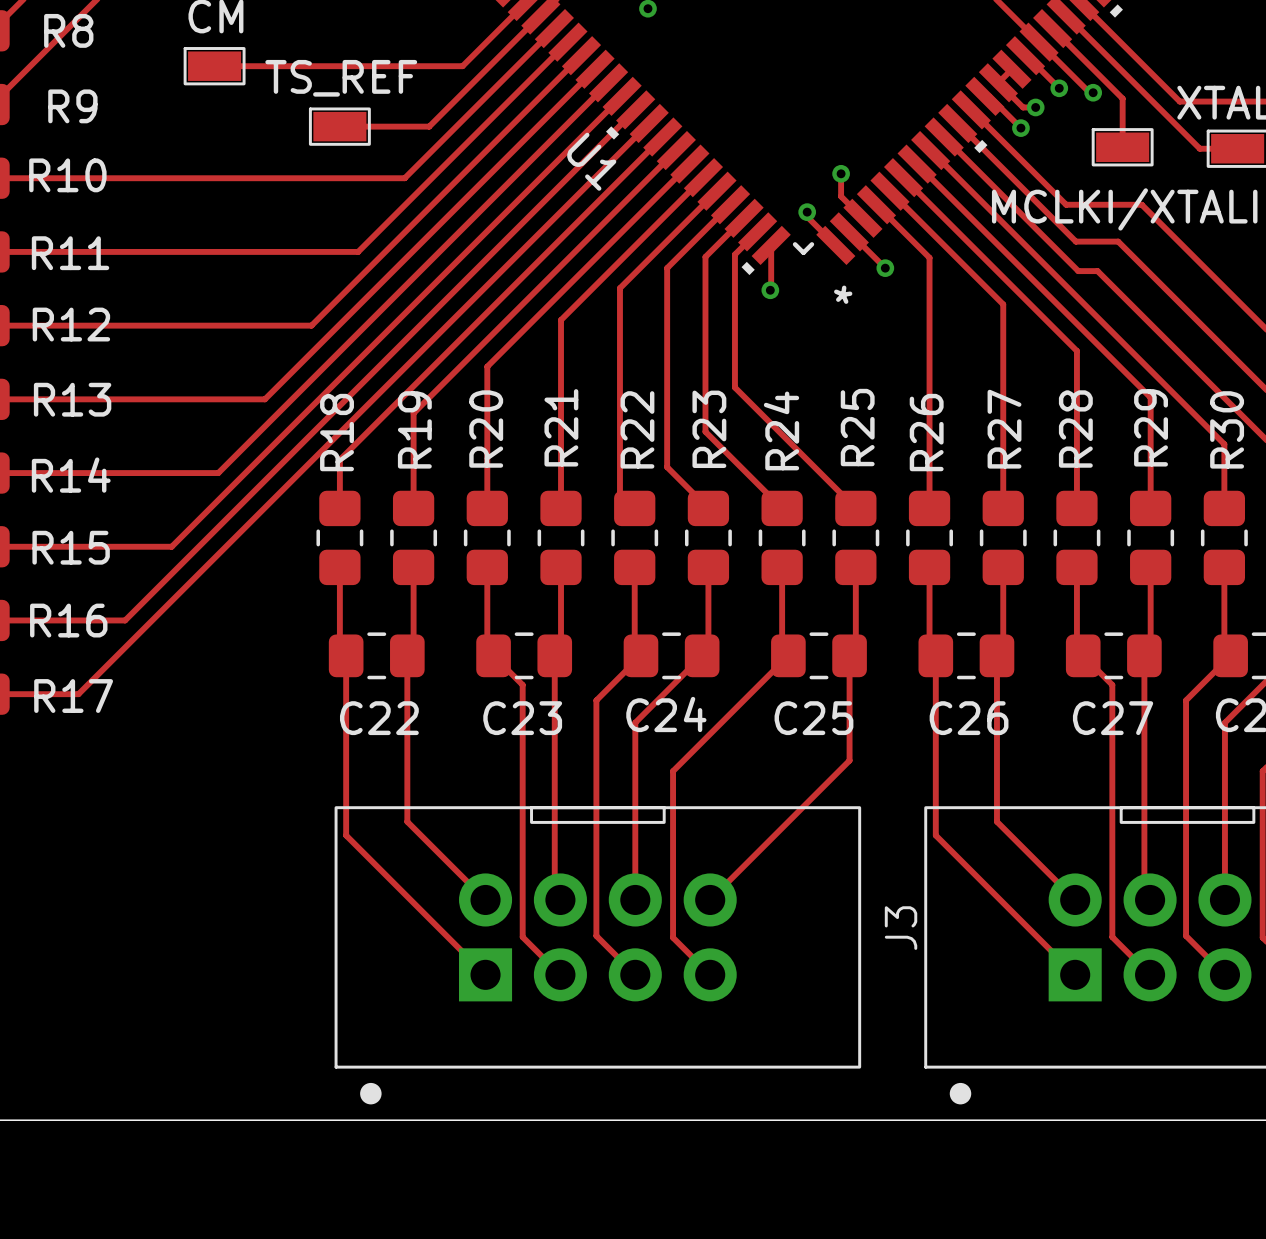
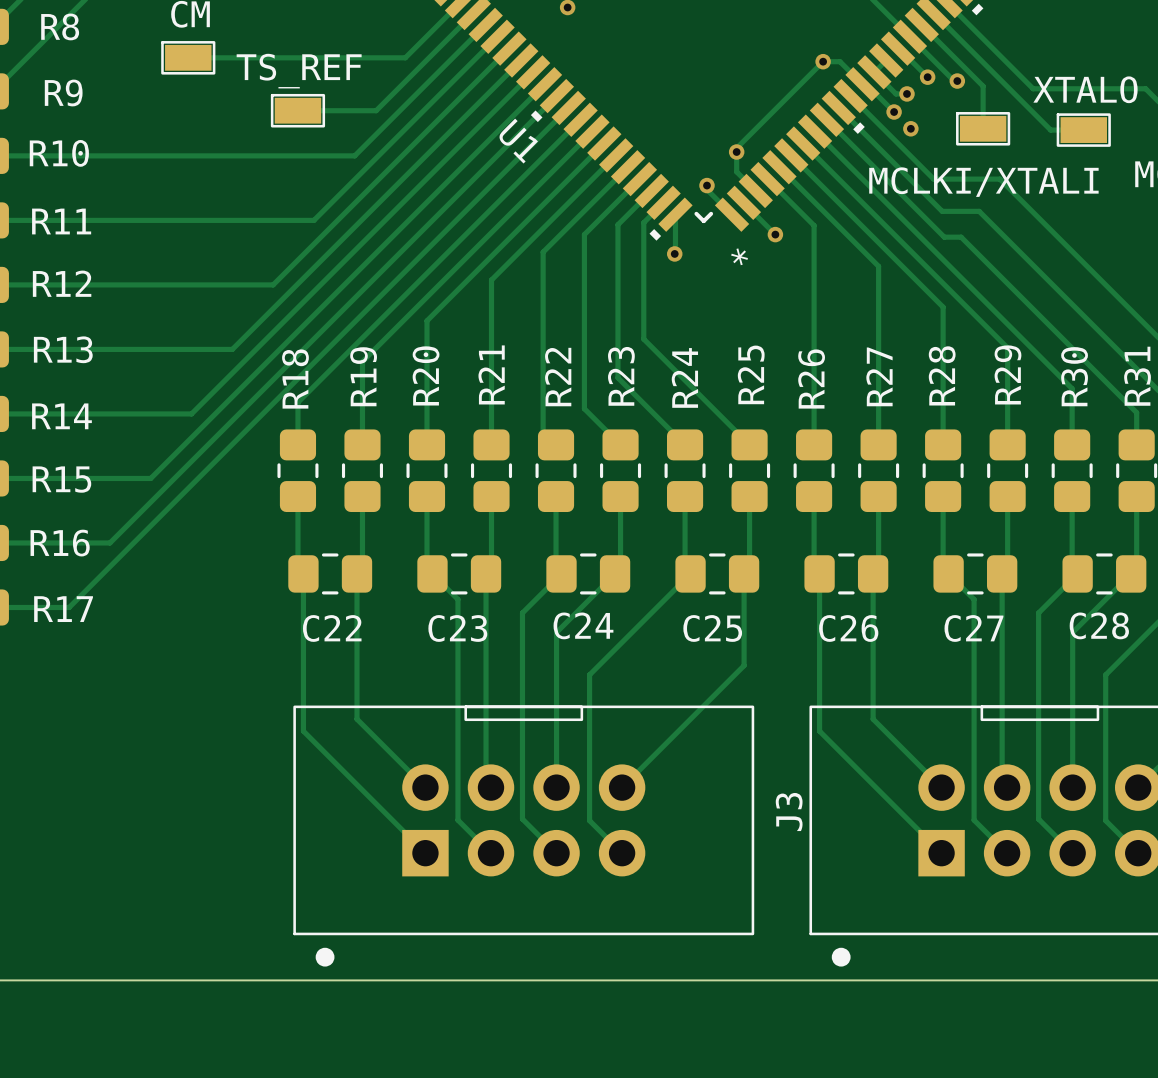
via: none -> (823, 61)
track: none -> (862, 84) (840, 61) (823, 61) (736, 148) (736, 152)
via: none -> (910, 128)

